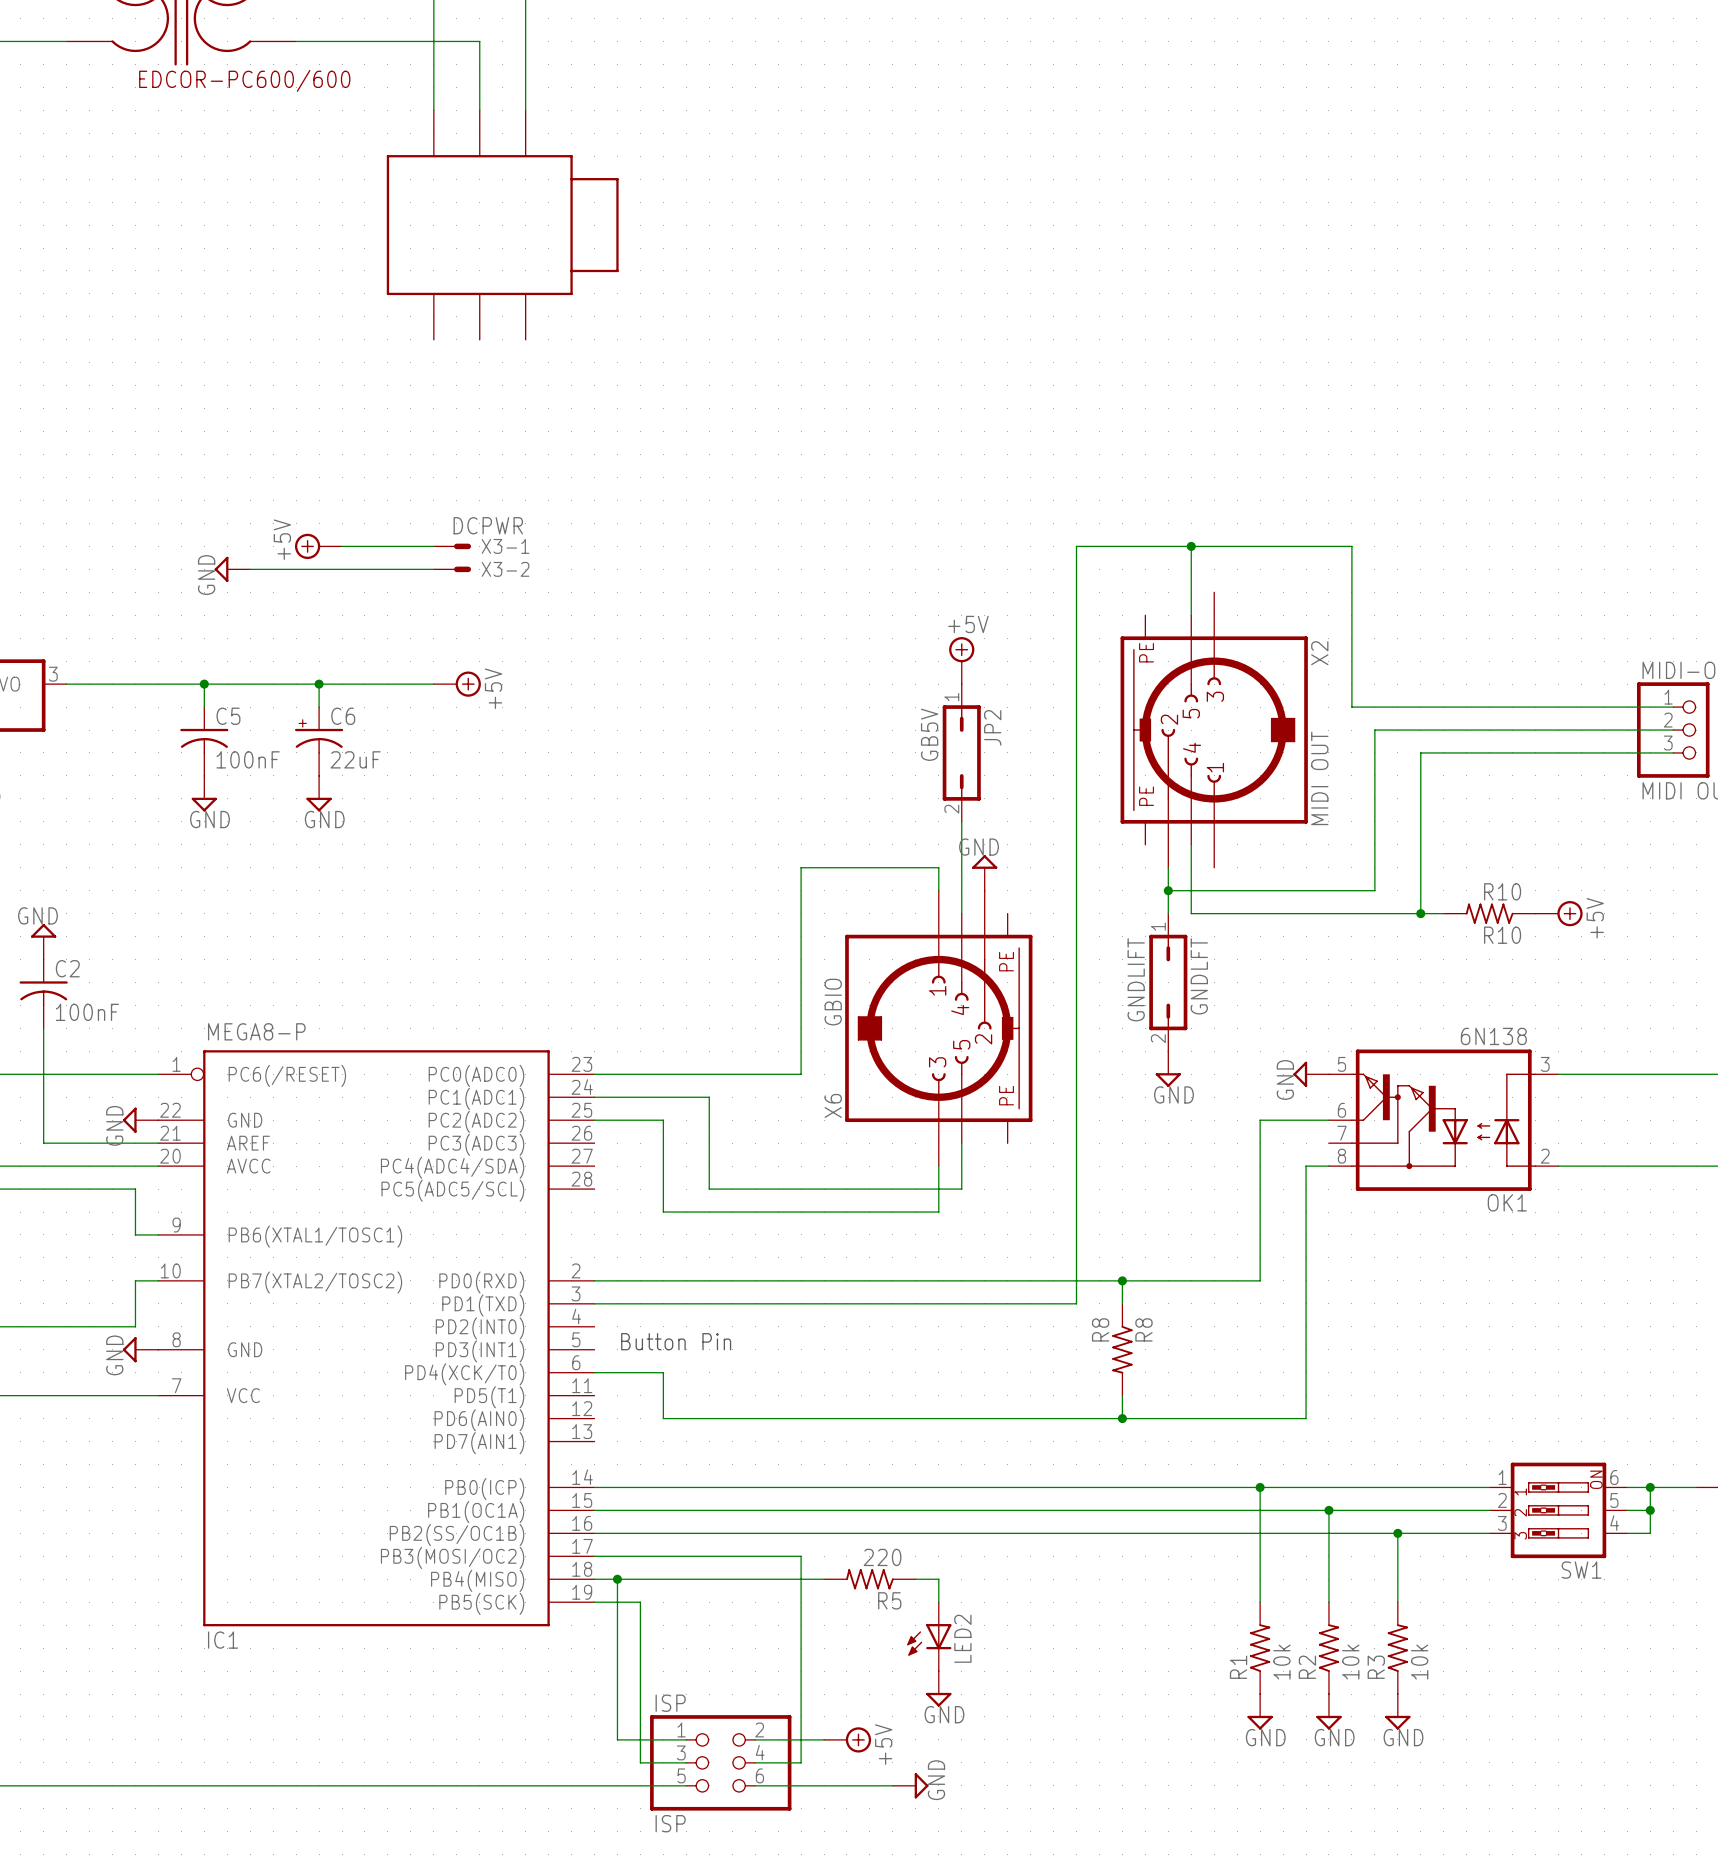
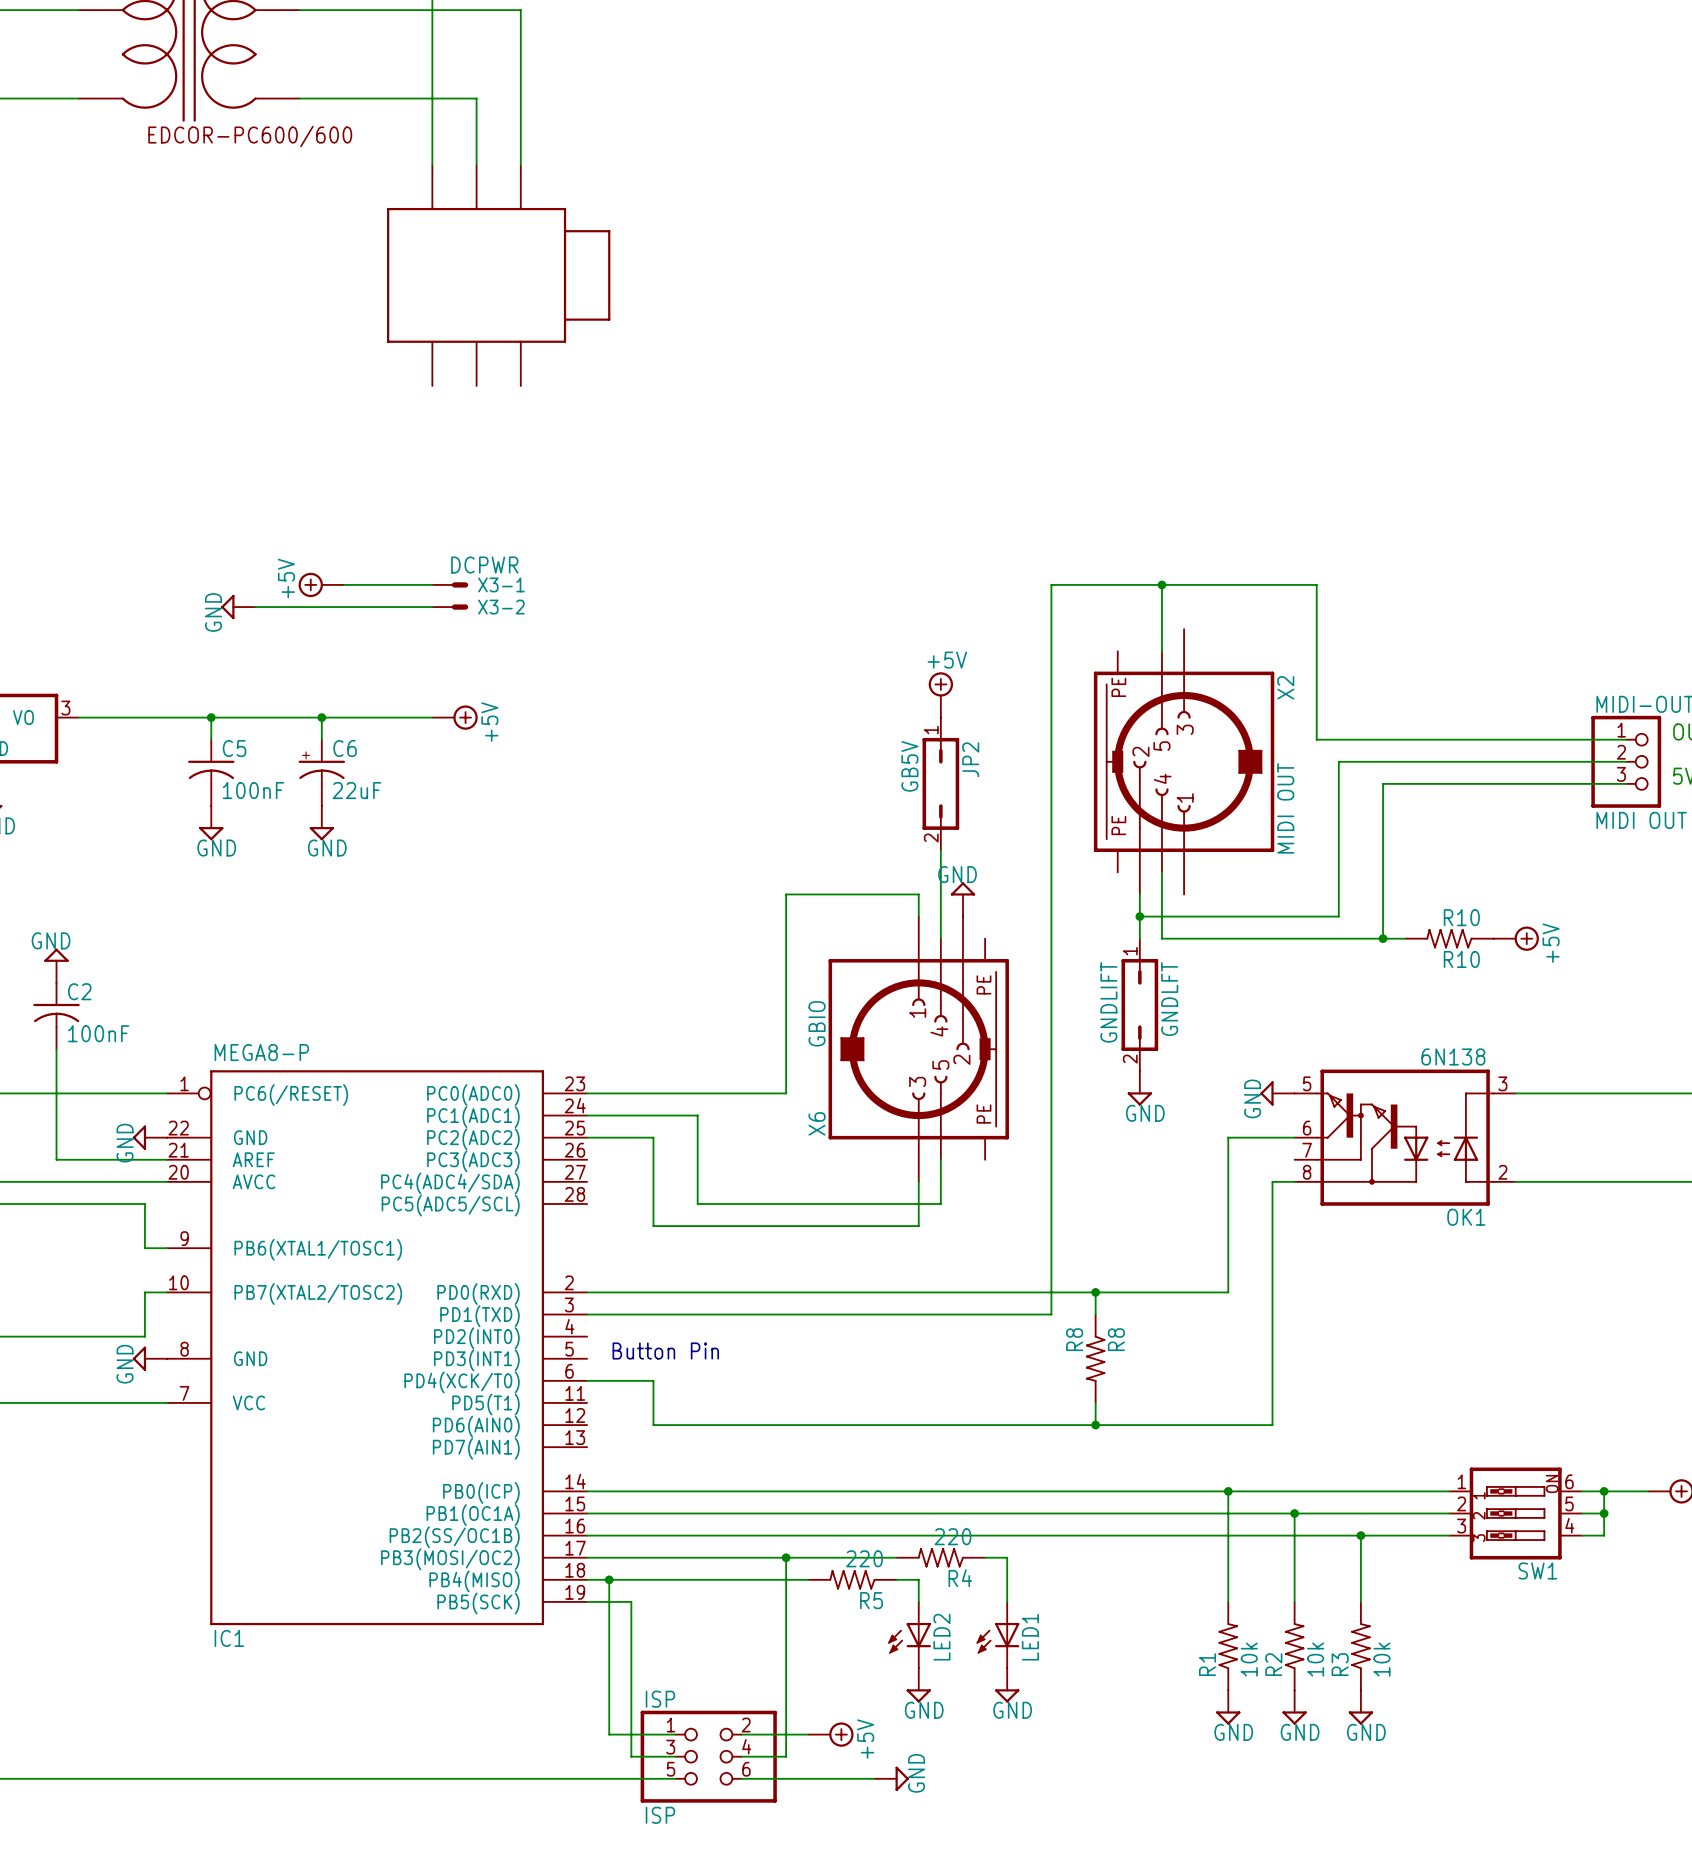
wire: none -> (786, 1557) (896, 1557)
junction: none -> (786, 1557)
R4: none -> 220 (940, 1557)
wire: none -> (985, 1557) (1007, 1557) (1007, 1601)
LED1: none -> (998, 1635)
power symbol: none -> GND (1007, 1685)

